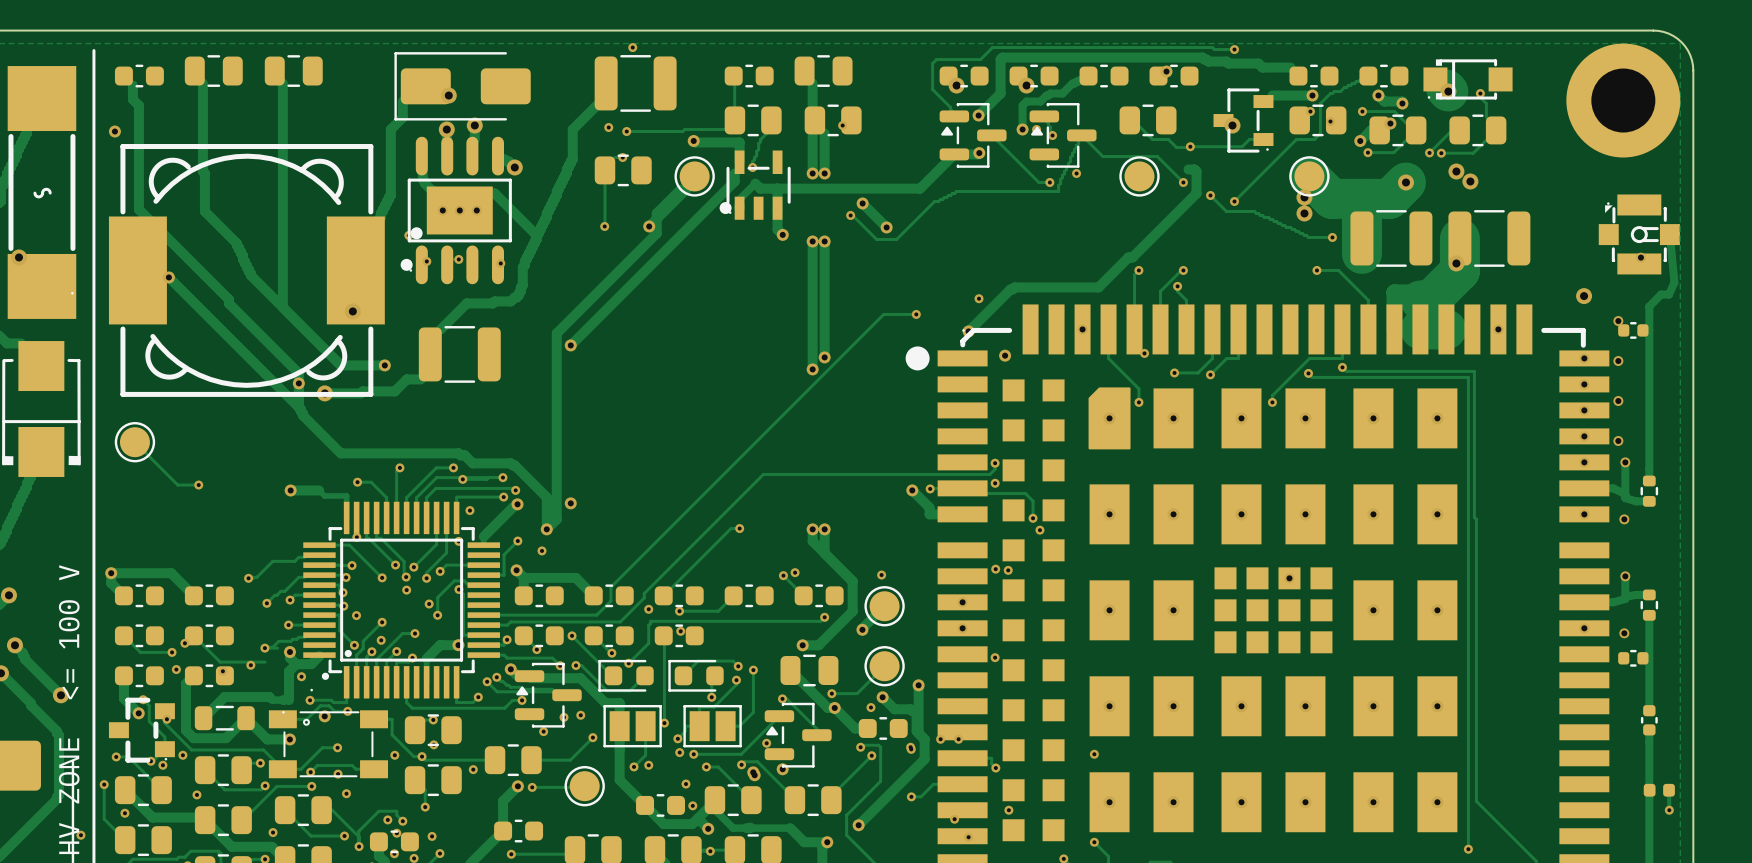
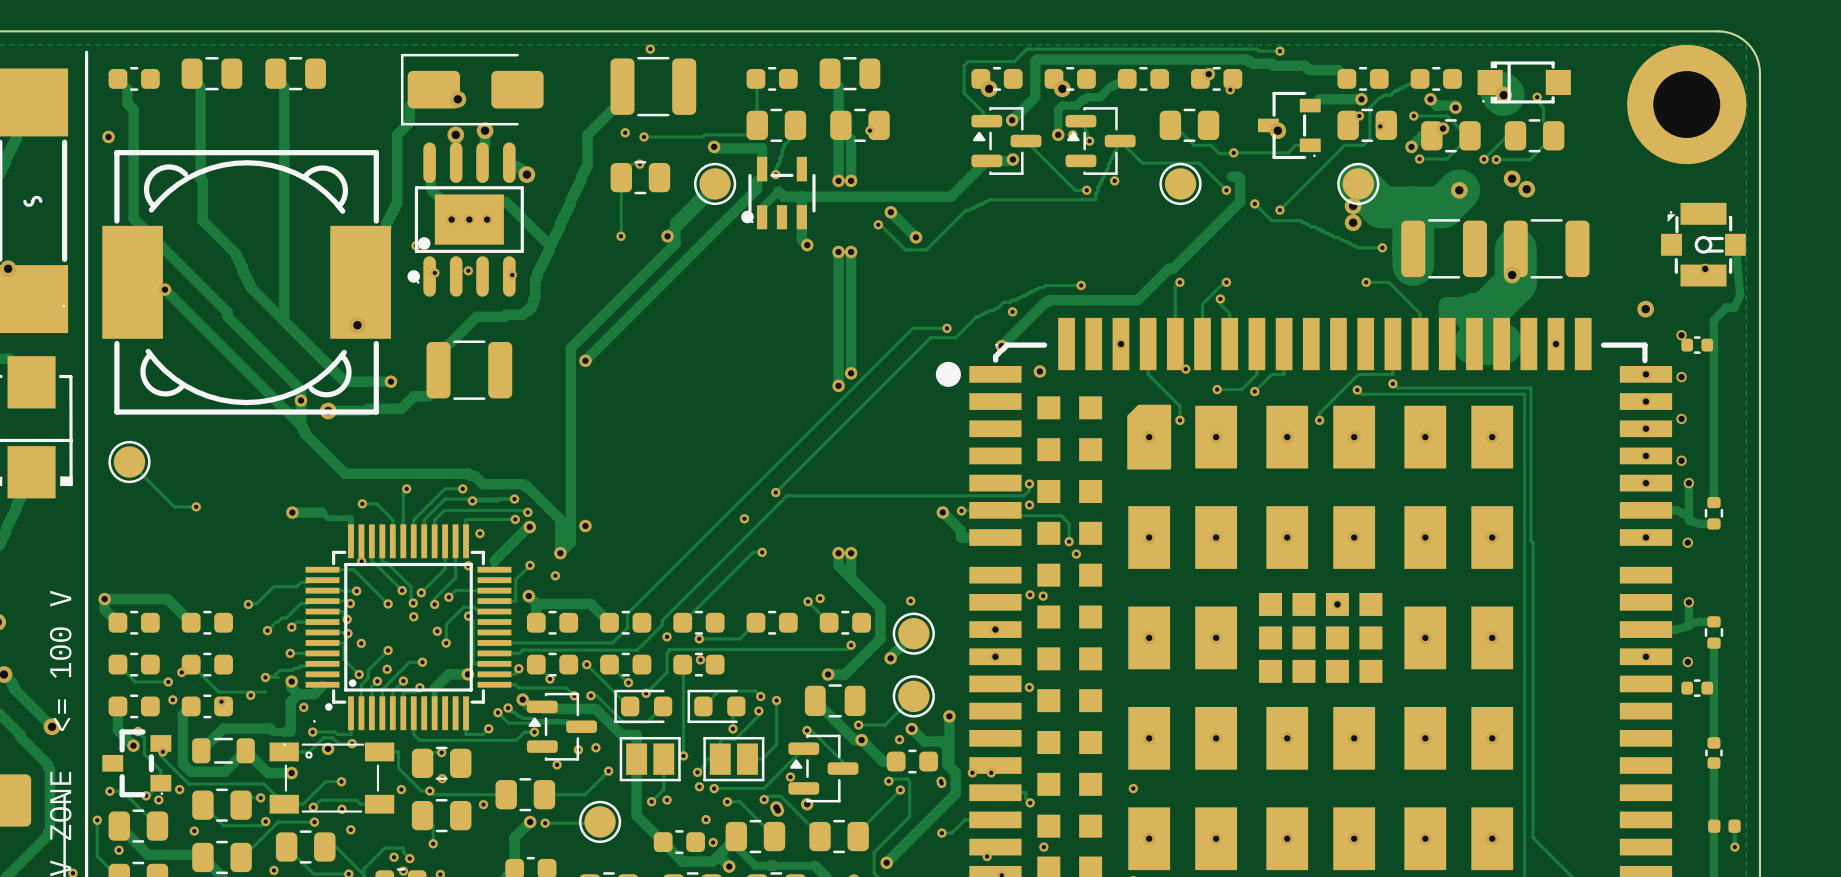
via: none -> (1230, 89)
track: none -> (1081, 285) (1045, 285) (1039, 287) (1016, 300) (1003, 302) (997, 308) (976, 316) (955, 337) (930, 337) (775, 492)
via: none -> (1081, 285)
via: none -> (775, 492)
via: none -> (744, 518)

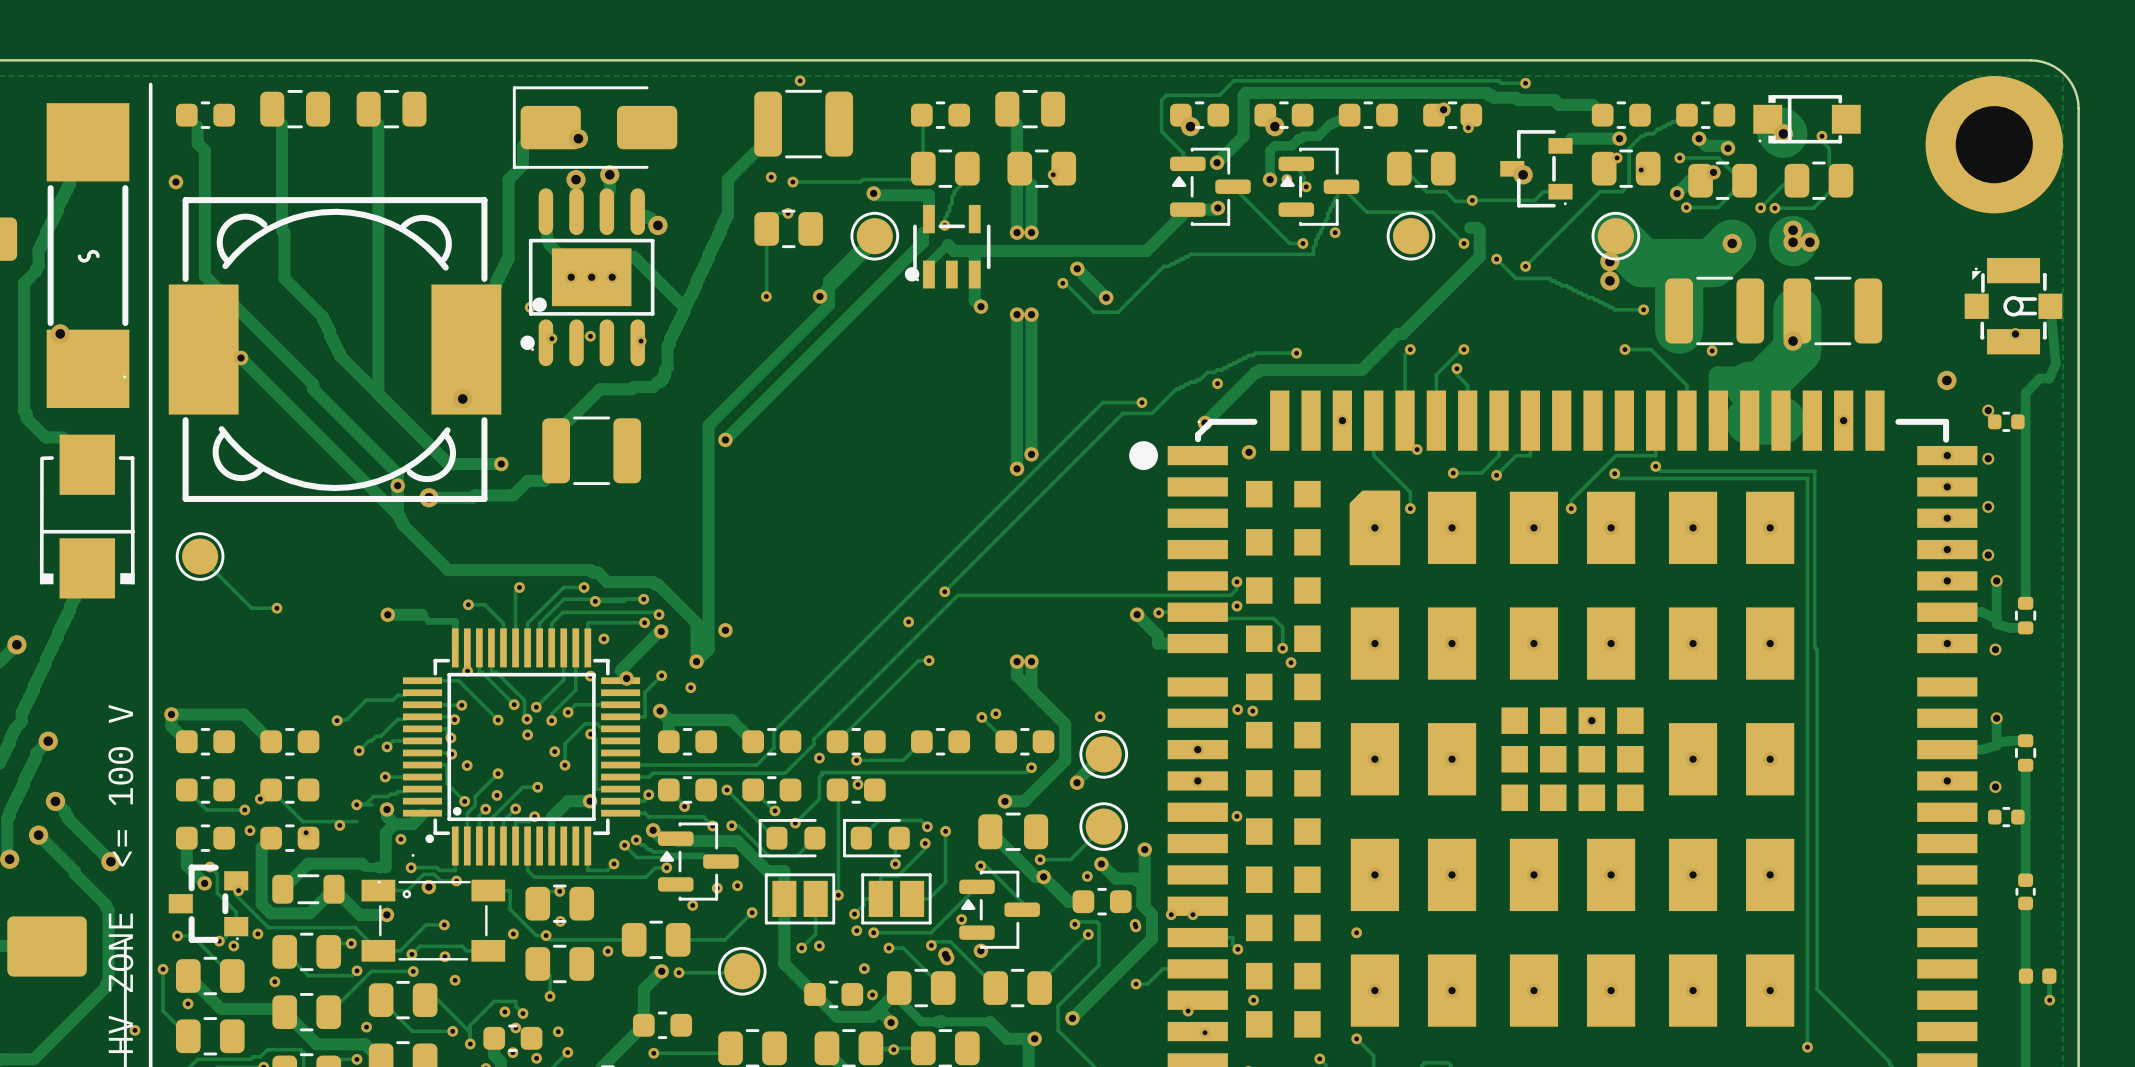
track: none -> (1793, 239) (1793, 242)
via: none -> (1793, 242)
via: none -> (1712, 350)
via: none -> (626, 678)

